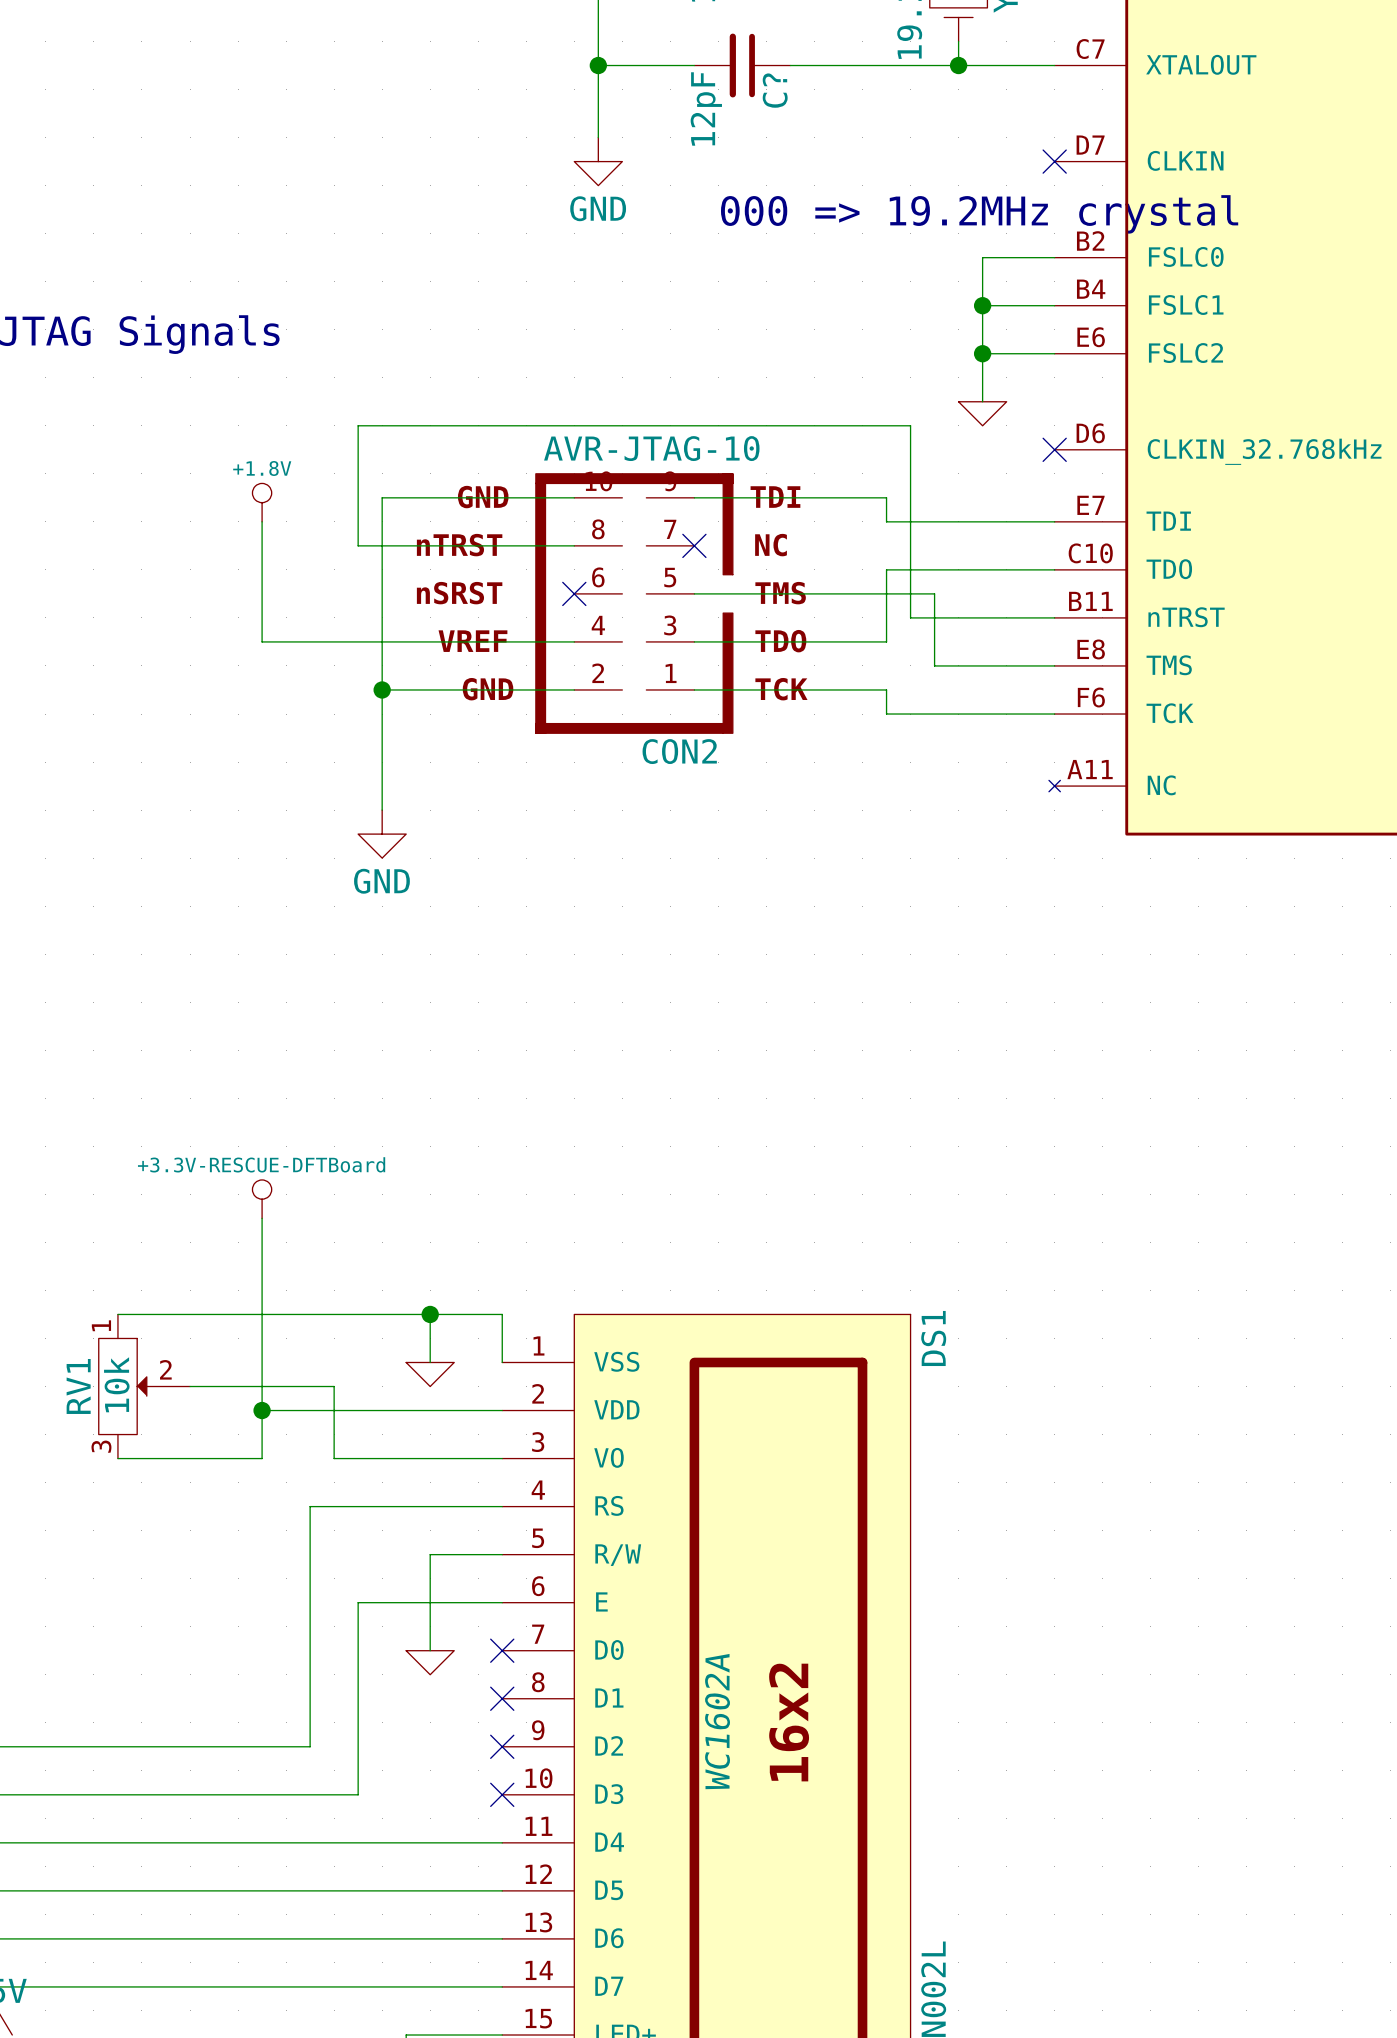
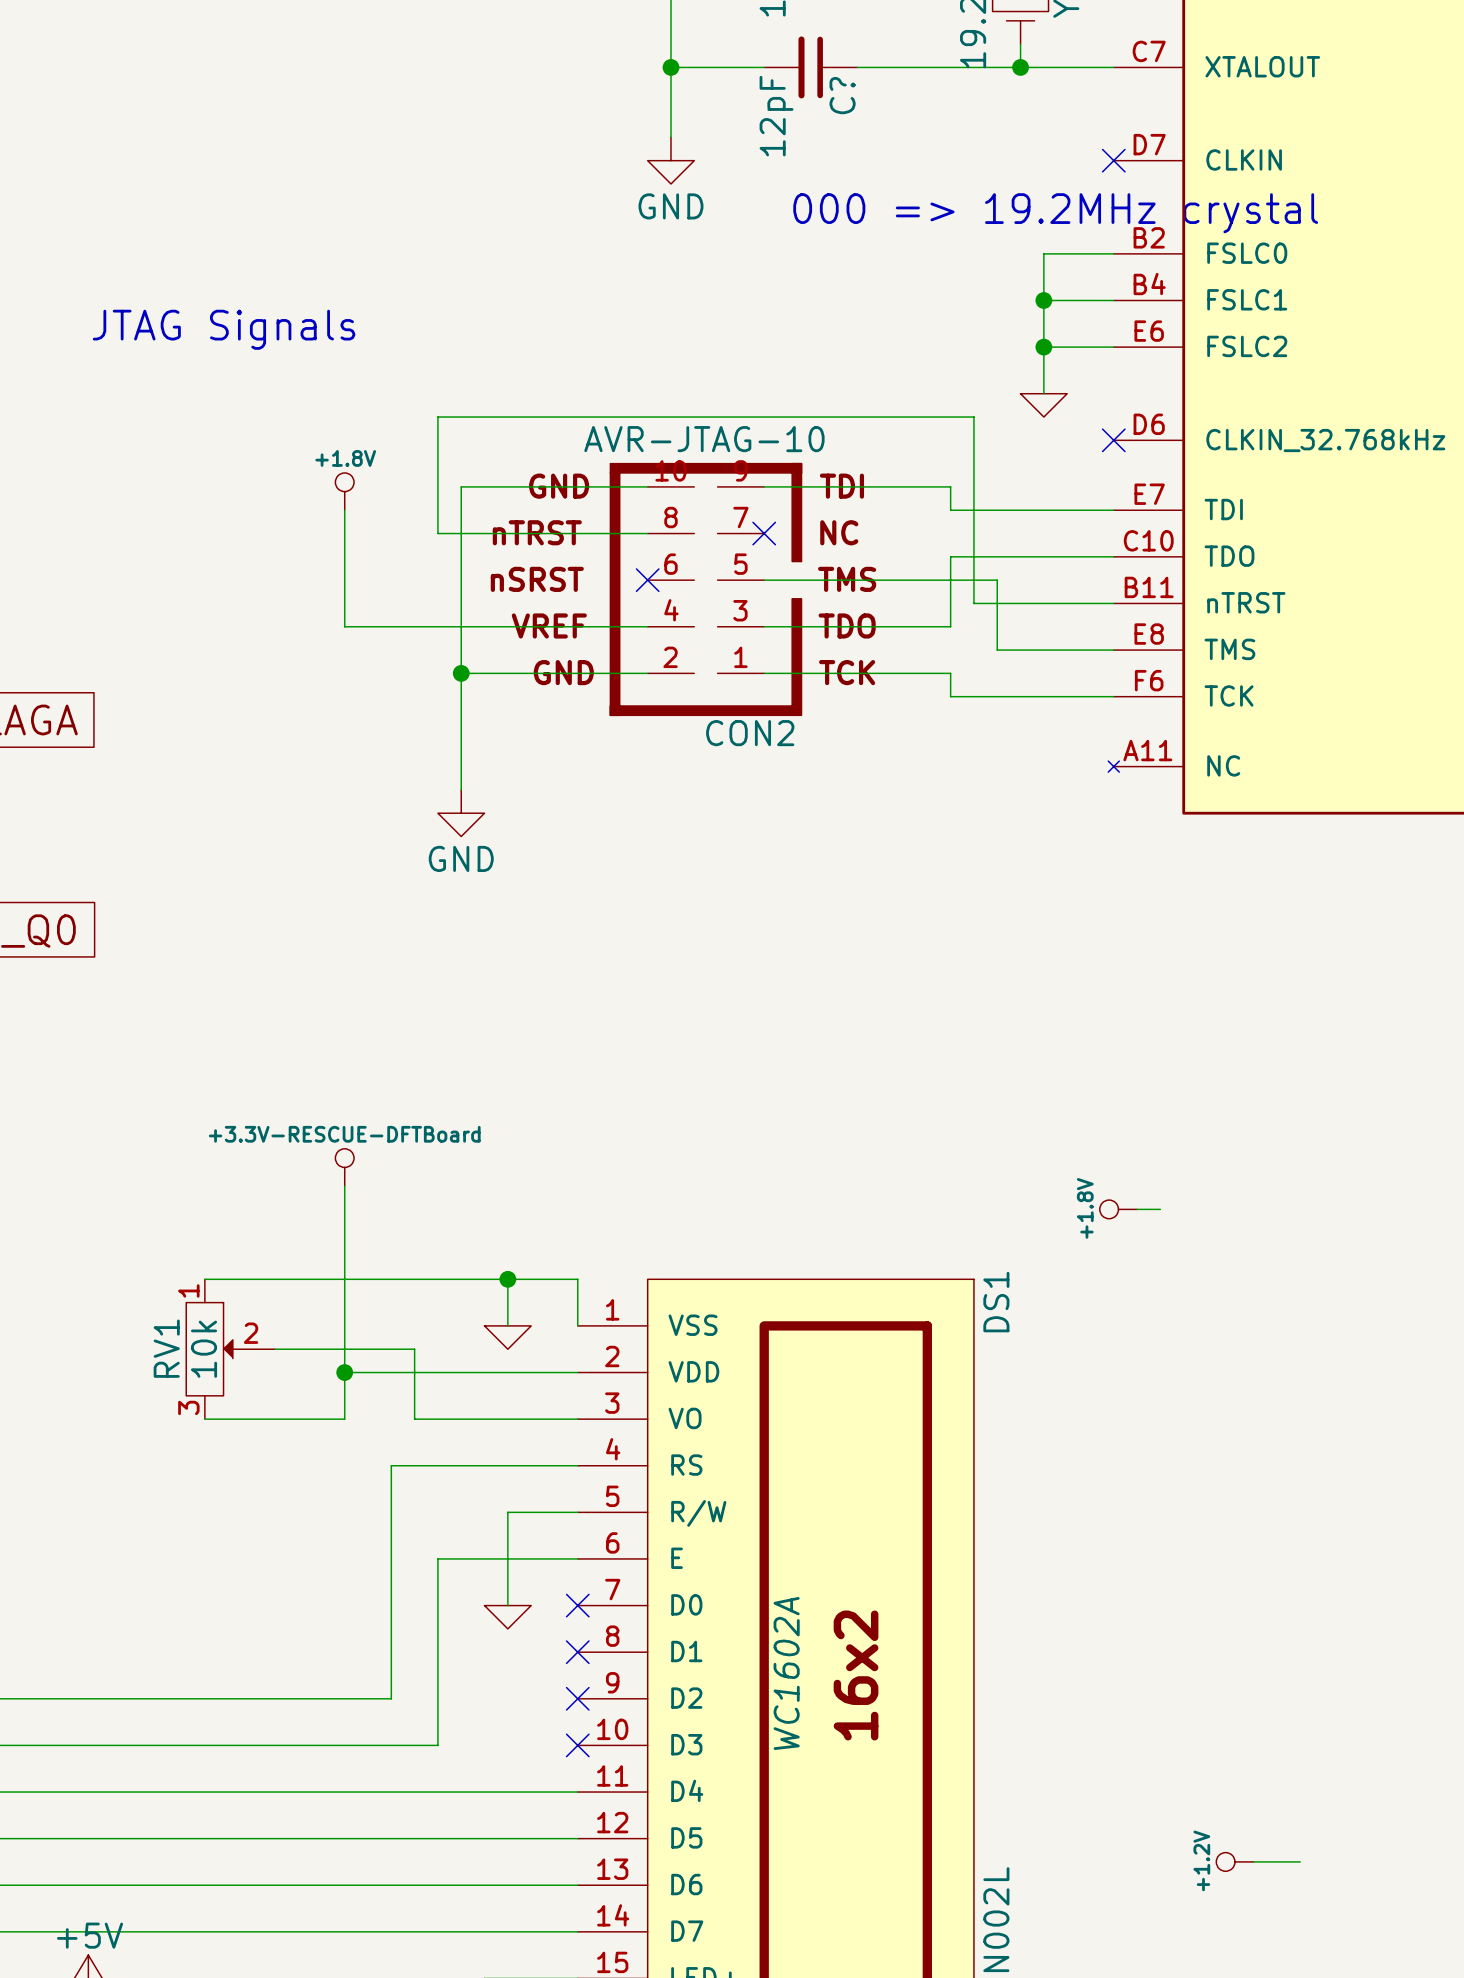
power symbol: none -> +1.8V (1118, 1209)
wire: none -> (1137, 1209) (1160, 1209)
power symbol: none -> +1.2V (1234, 1861)
wire: none -> (1253, 1861) (1300, 1861)

